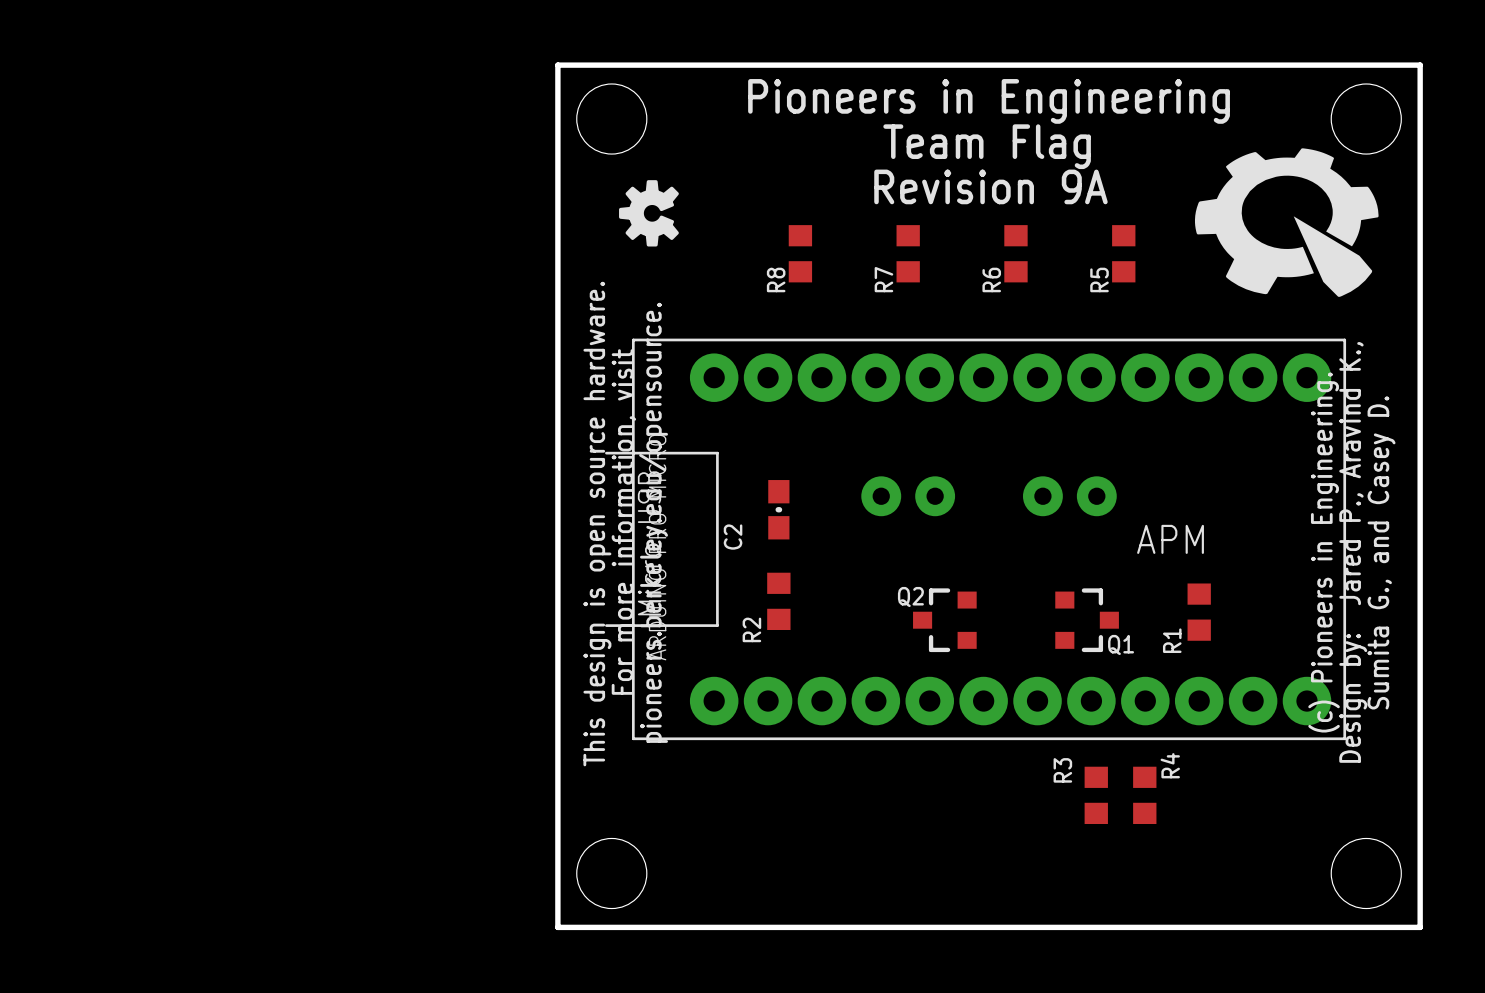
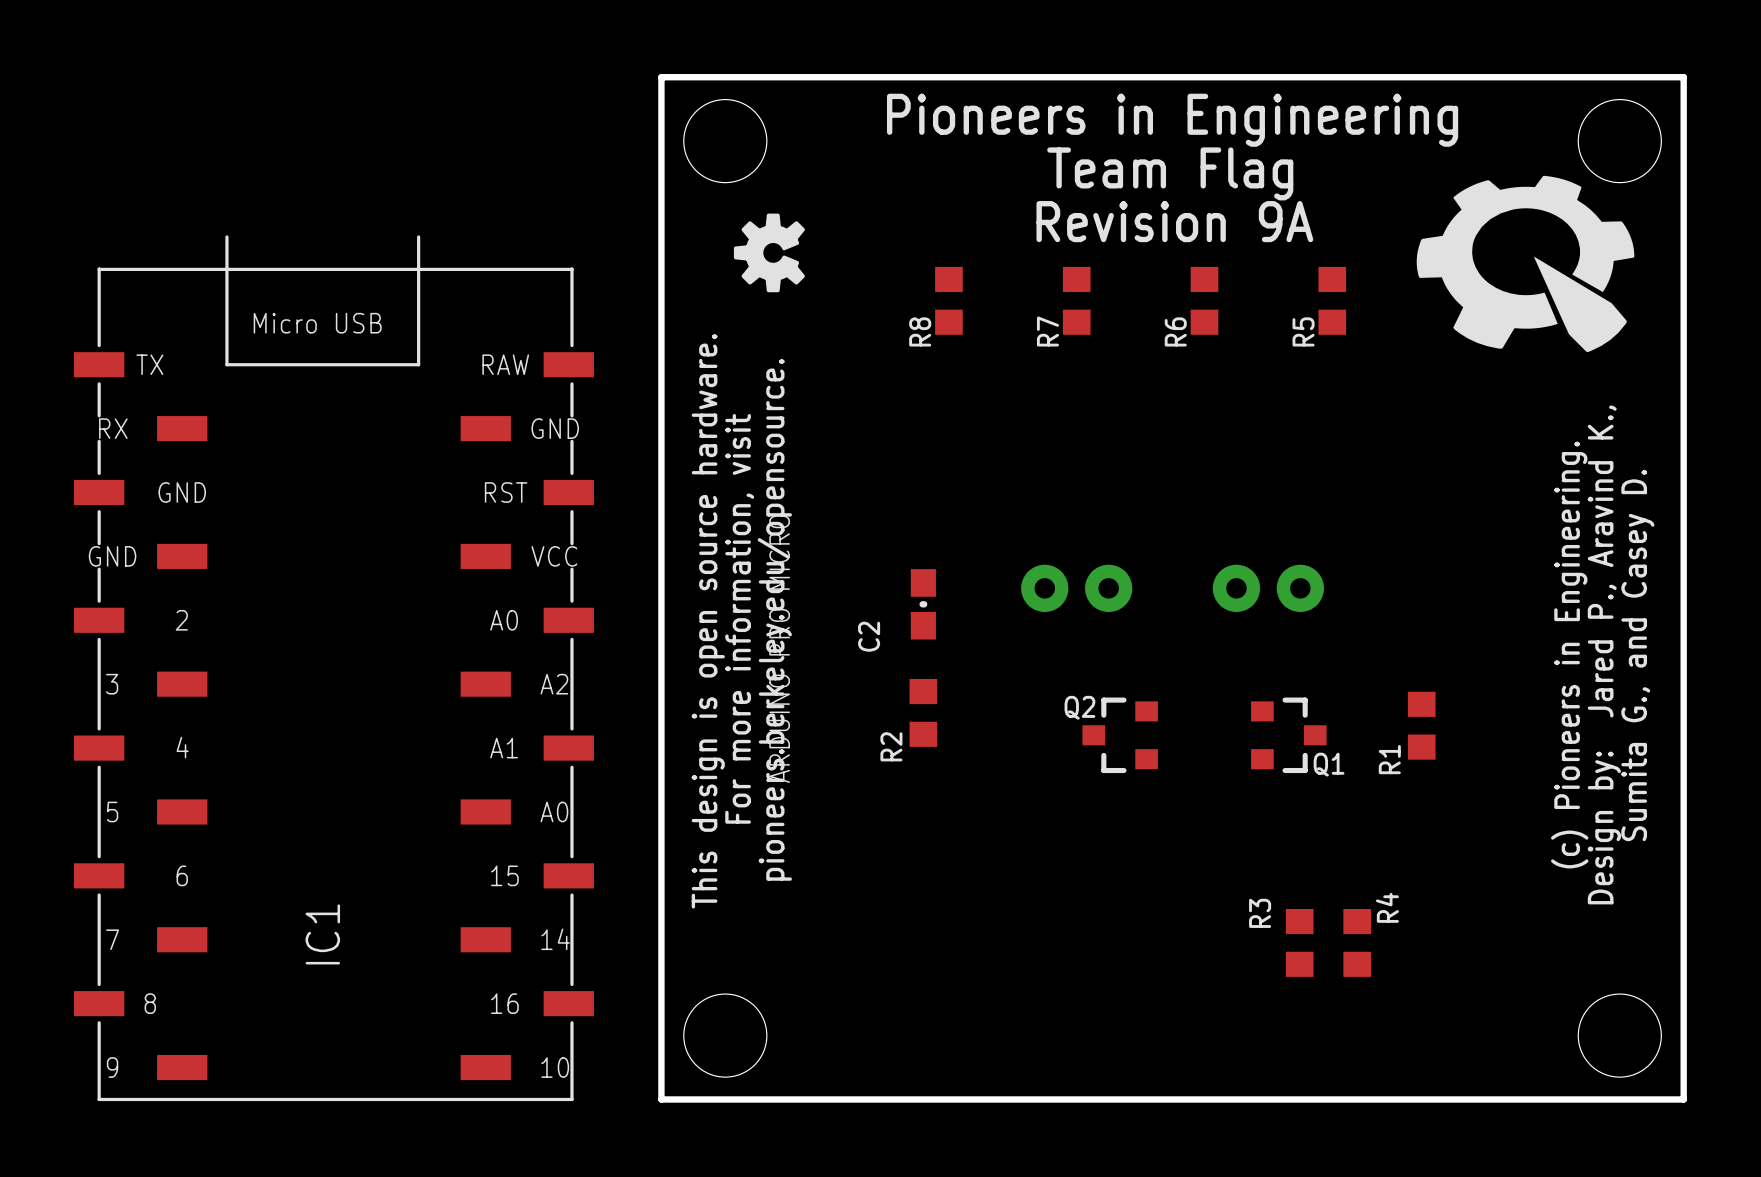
APM: (975, 539) -> none
IC1: none -> (333, 668)

